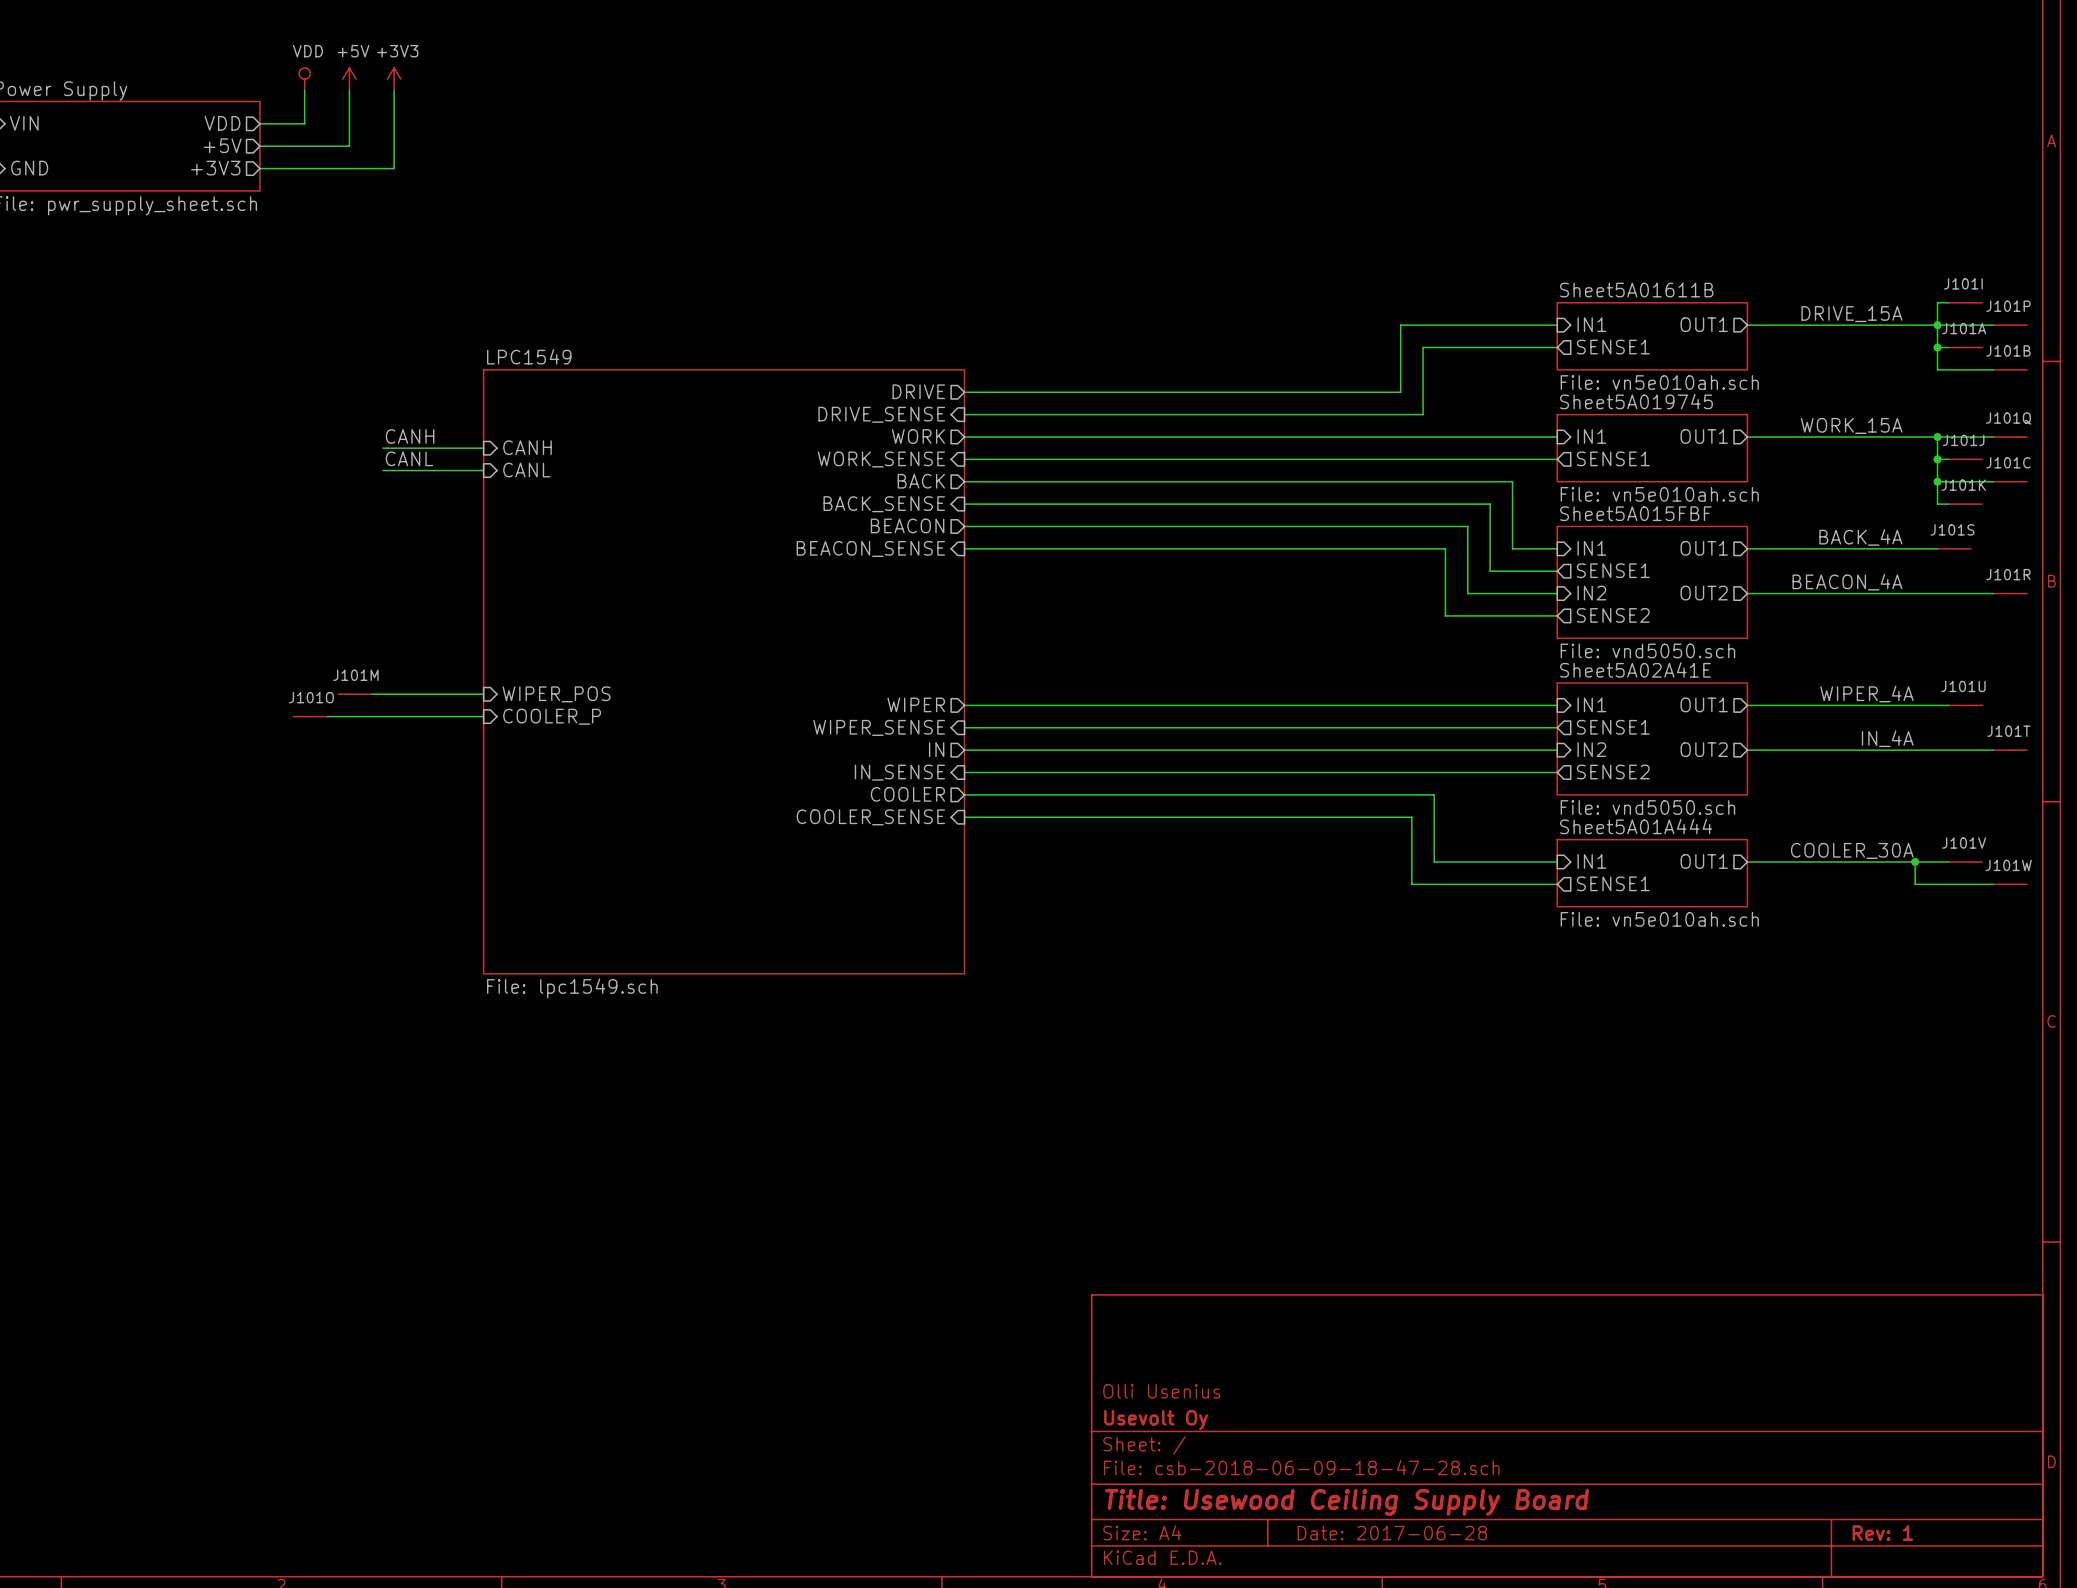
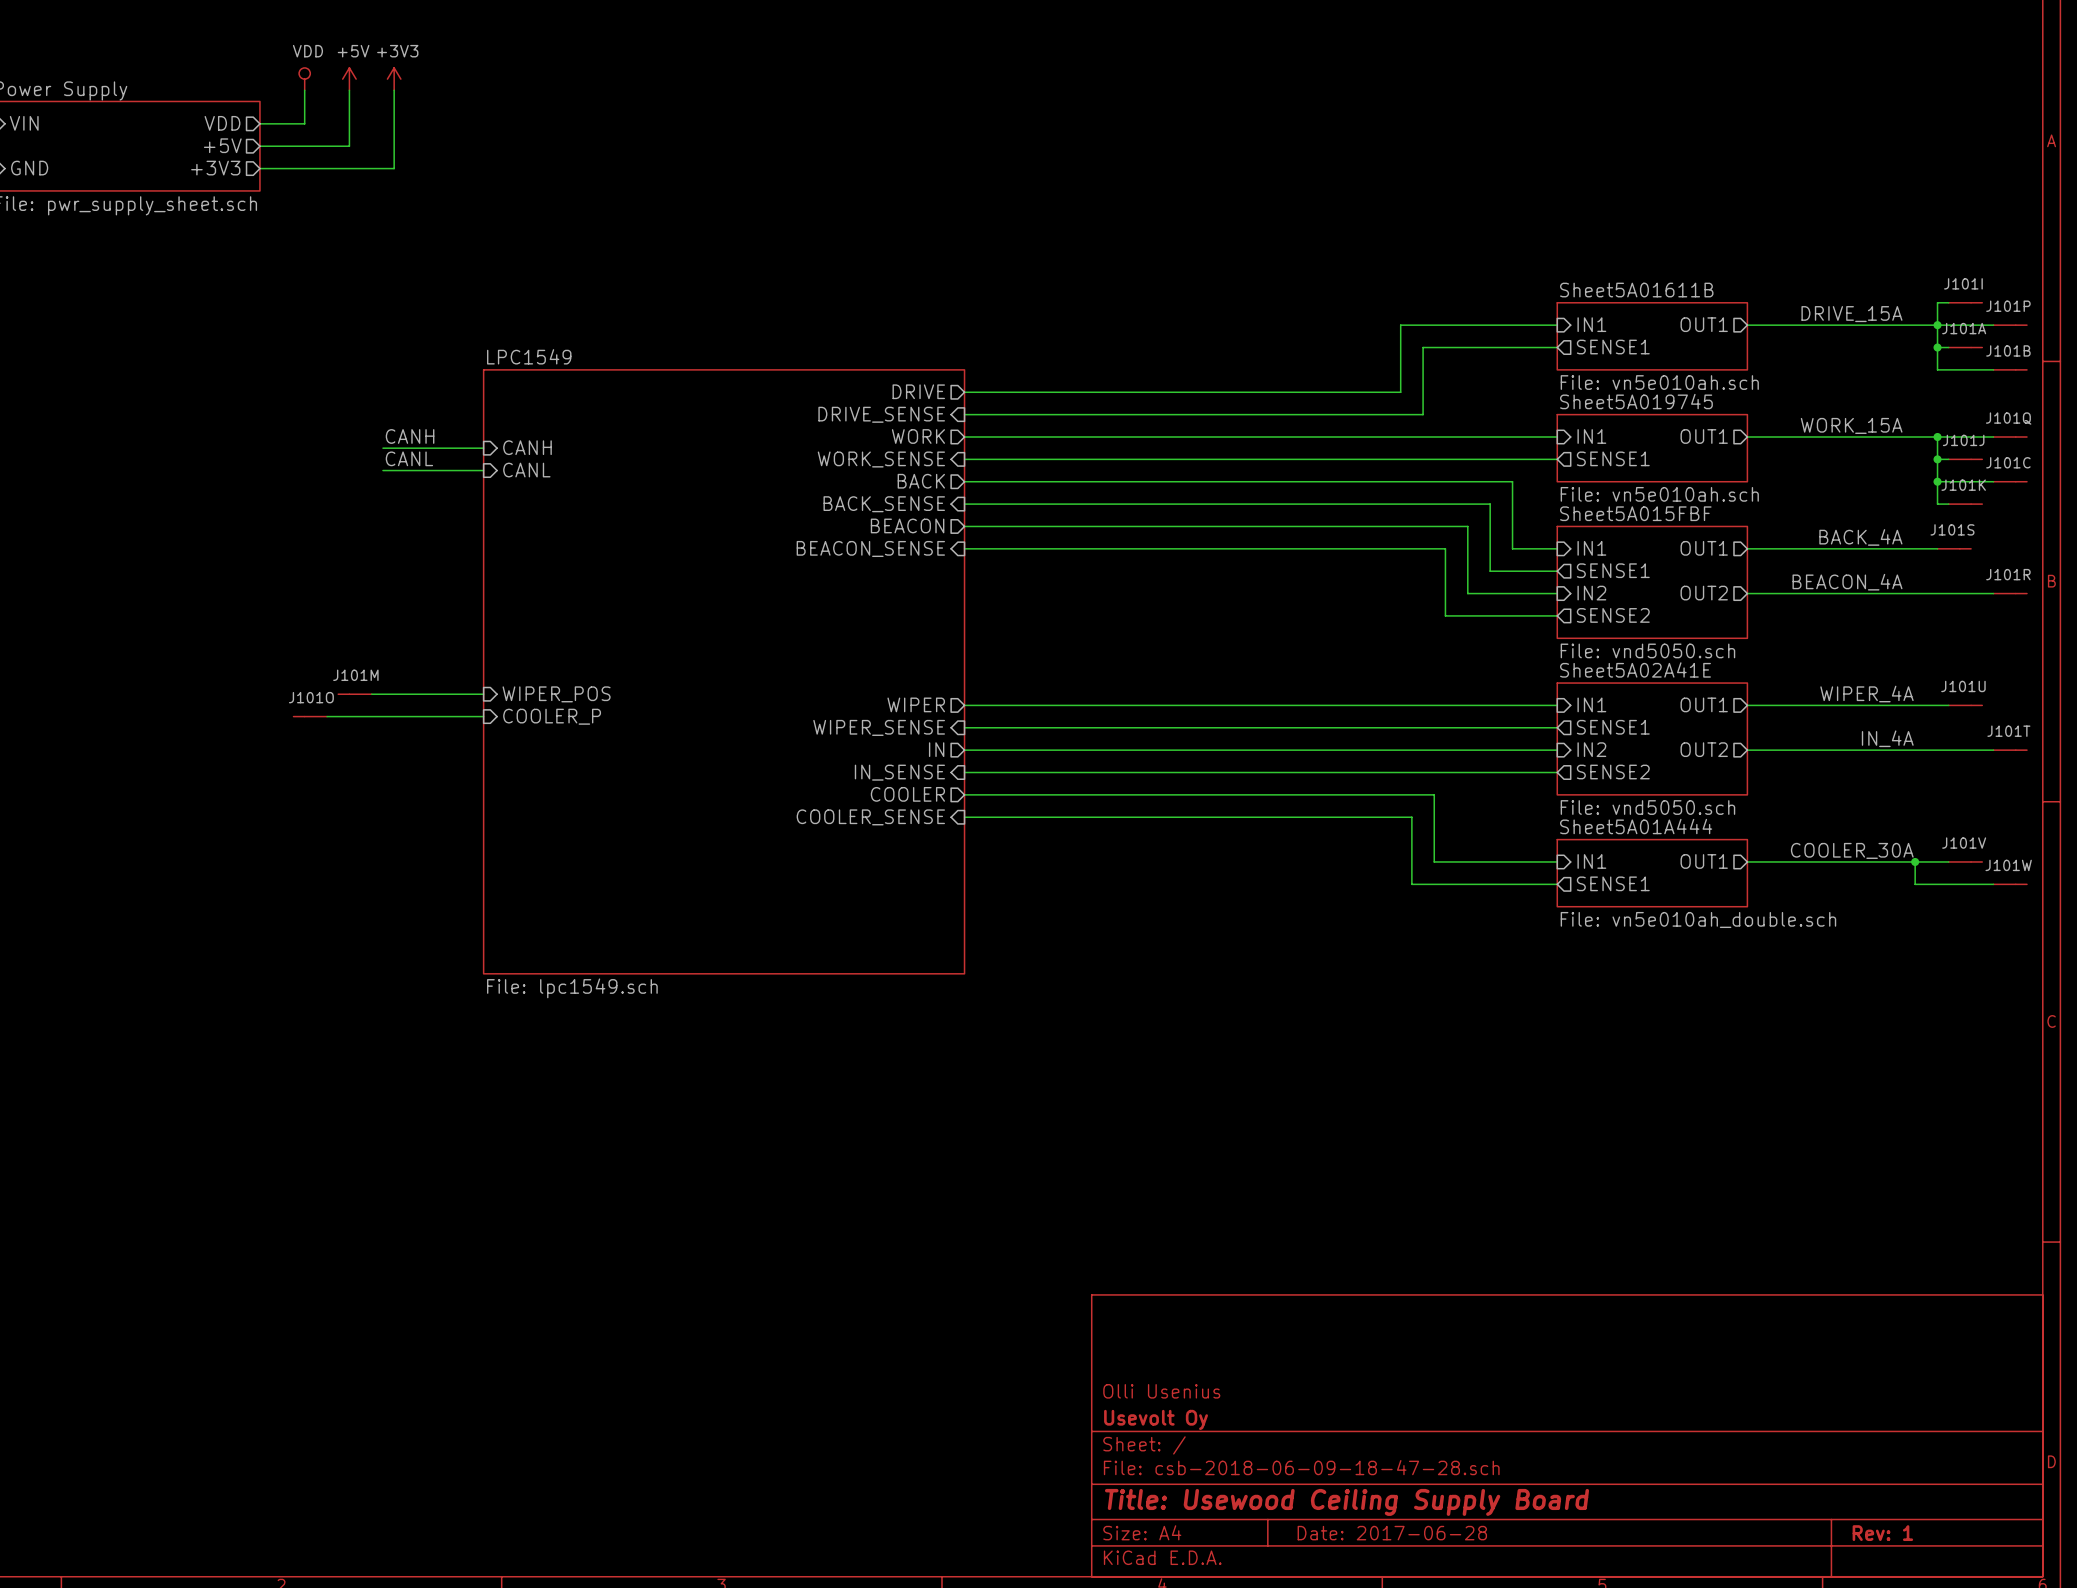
sheet Sheet5A01A444 value: File: vn5e010ah.sch (1659, 919) -> File: vn5e010ah_double.sch (1698, 919)

